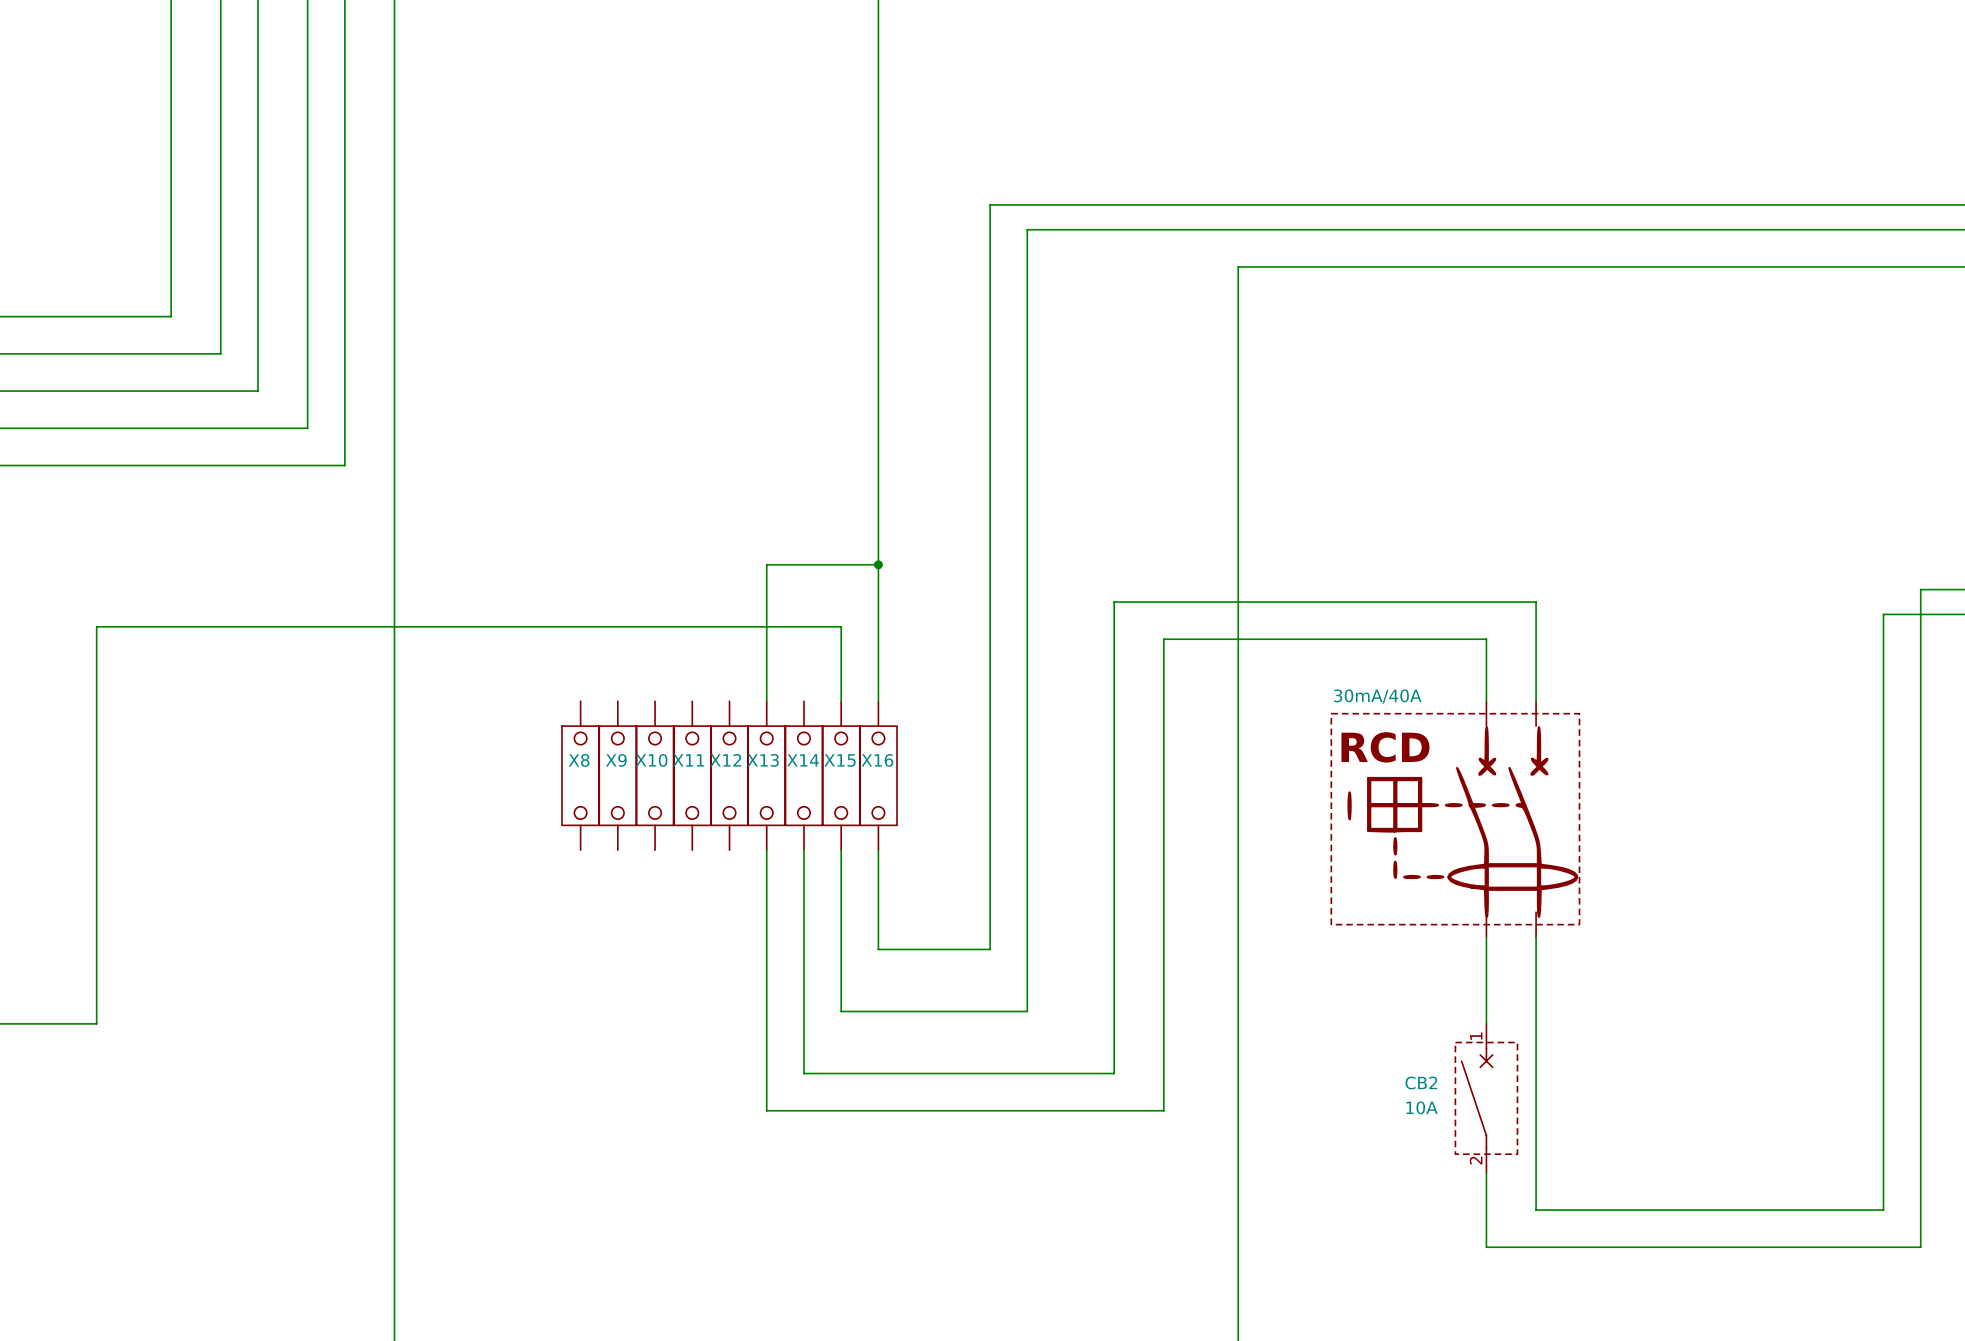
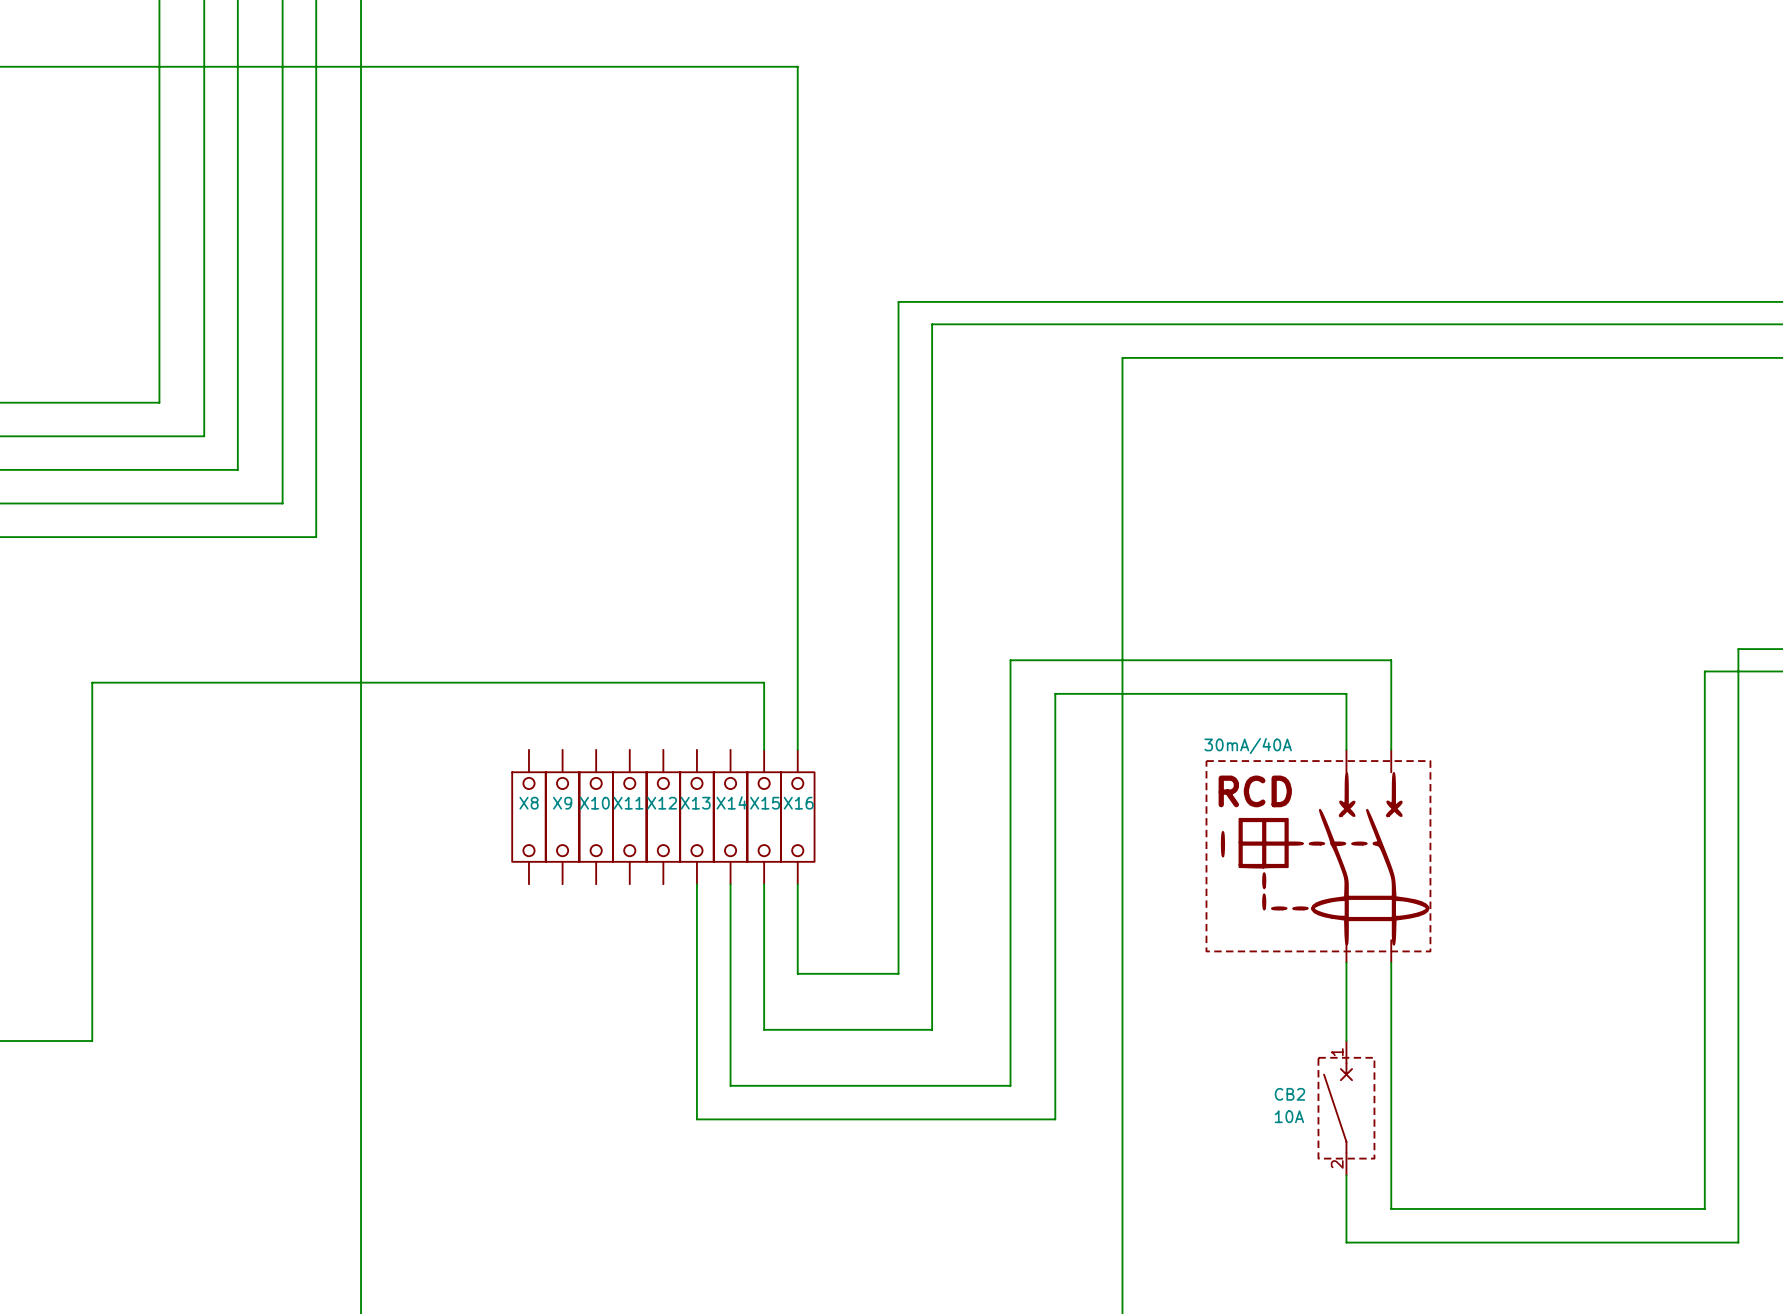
wire: (878, 564) (766, 564) (766, 701) -> none
junction: (878, 564) -> none

